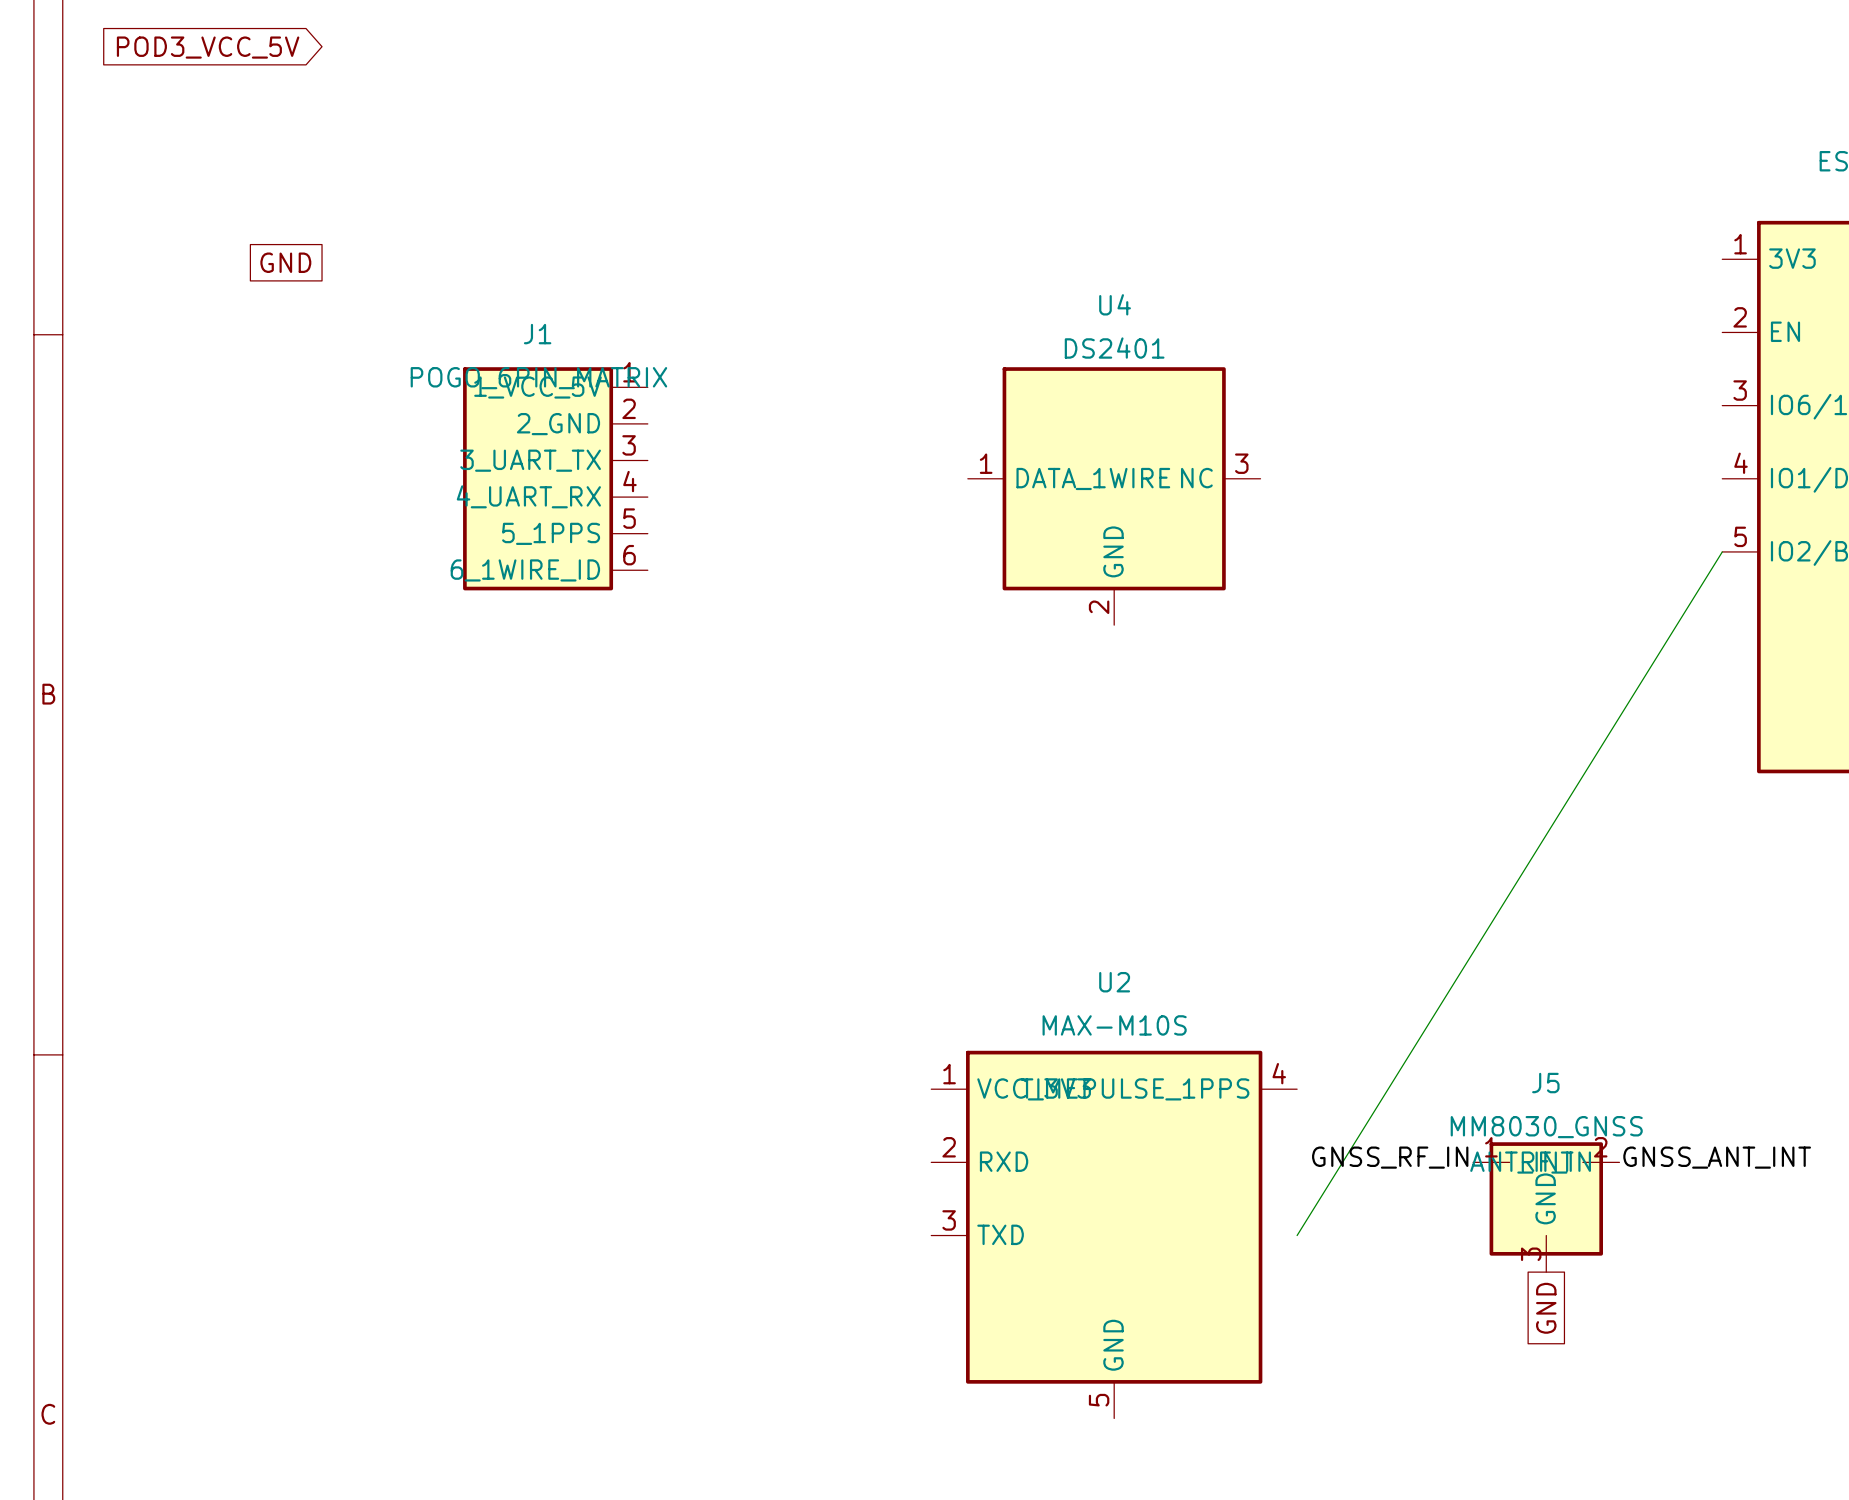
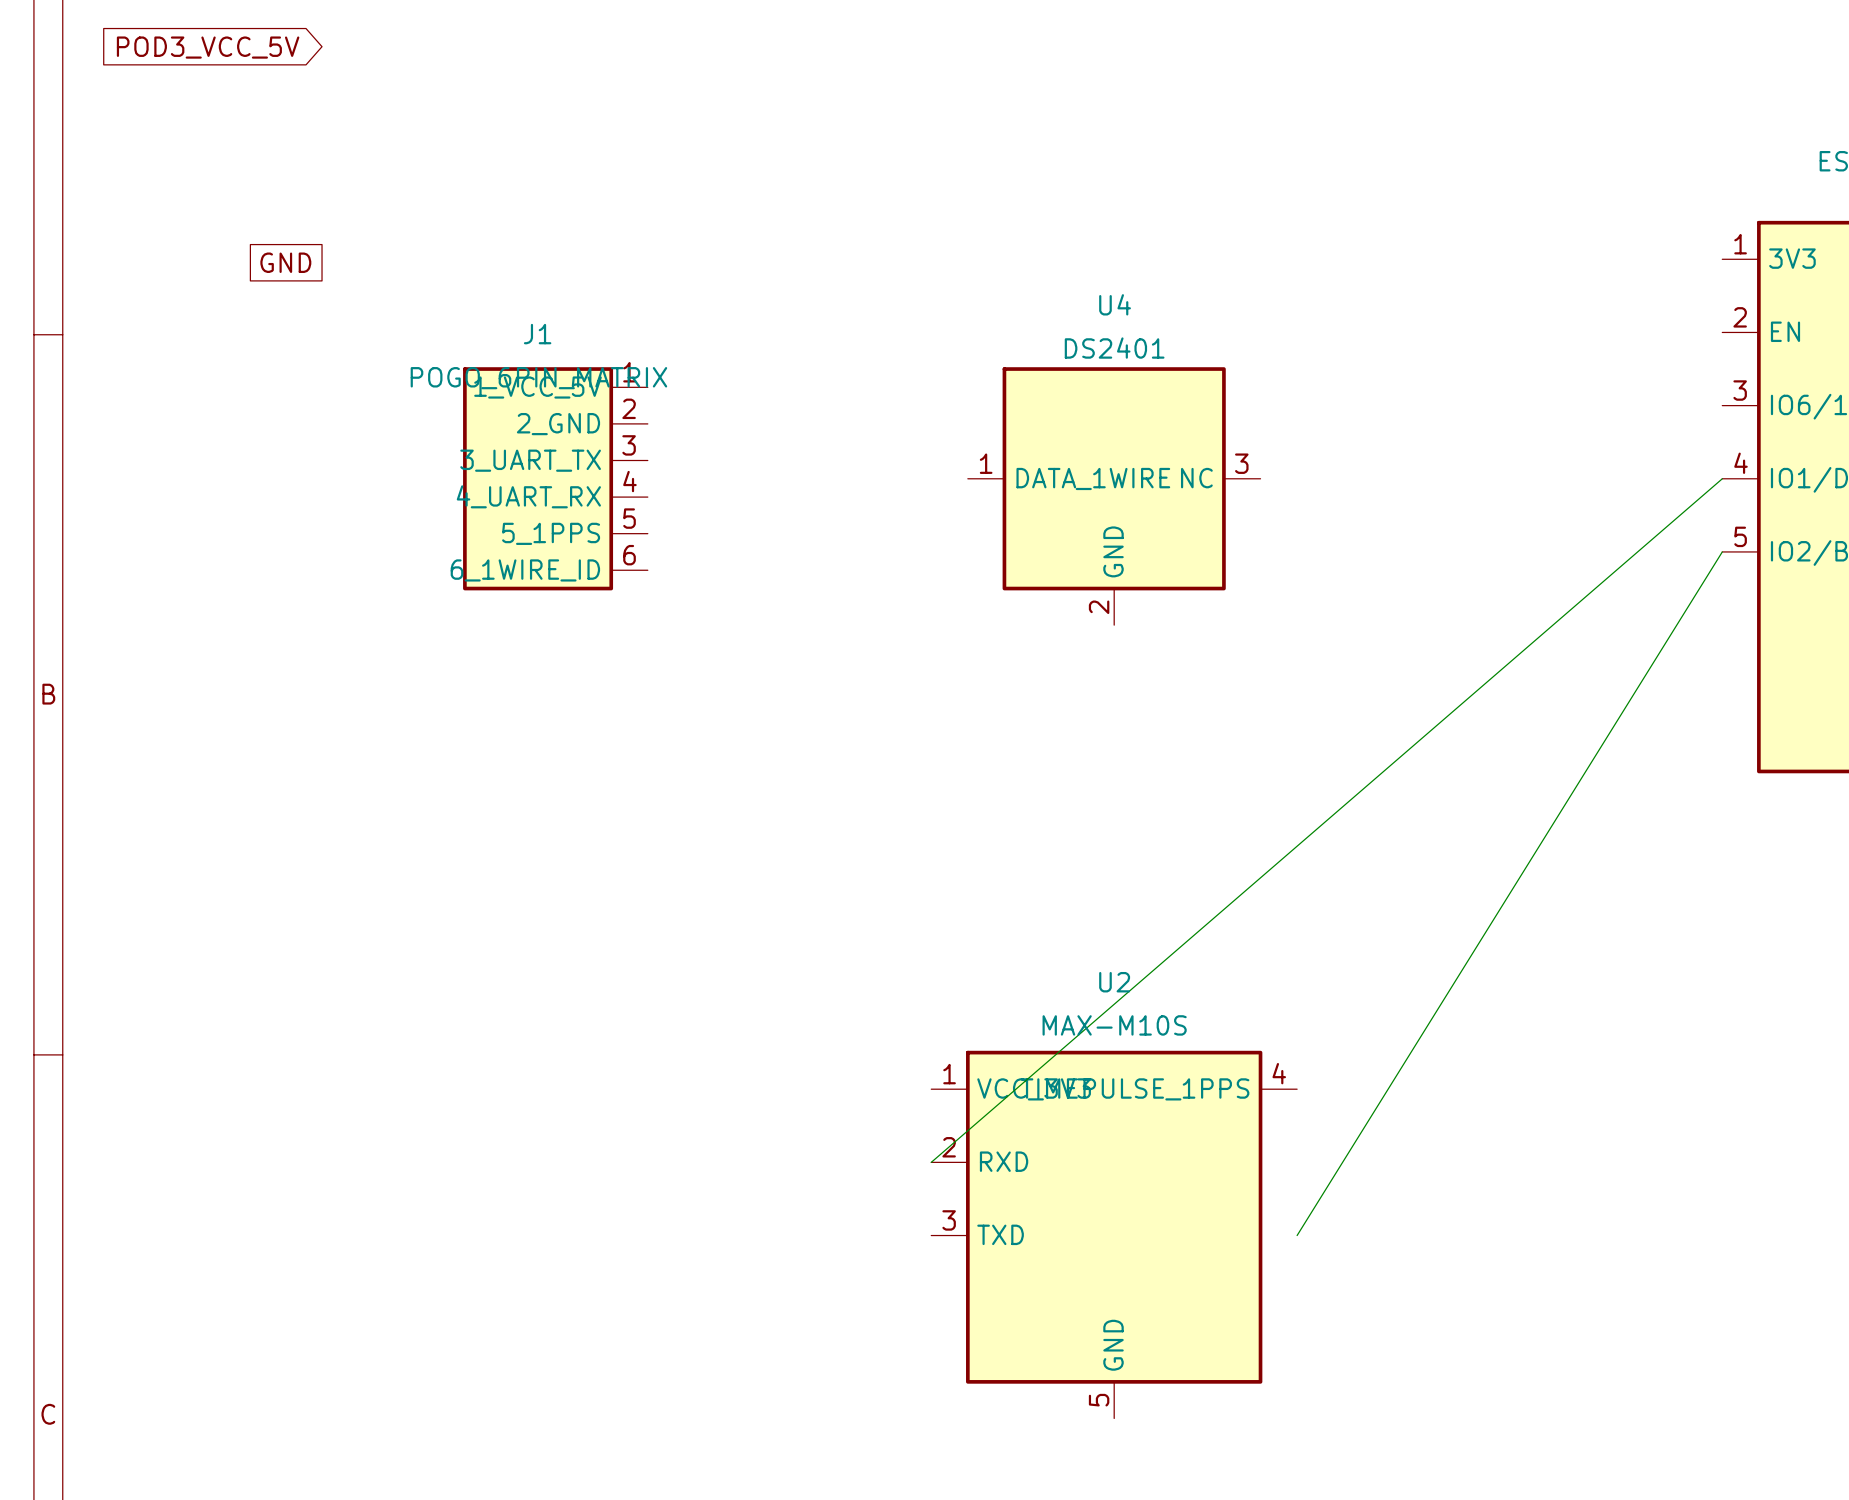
wire: none -> (1722, 478) (931, 1162)
label: GNSS_RF_IN (1390, 1157) -> none
label: GNSS_ANT_INT (1717, 1157) -> none
J5: MM8030_GNSS (1546, 1207) -> none
global label: GND (1546, 1308) -> none

